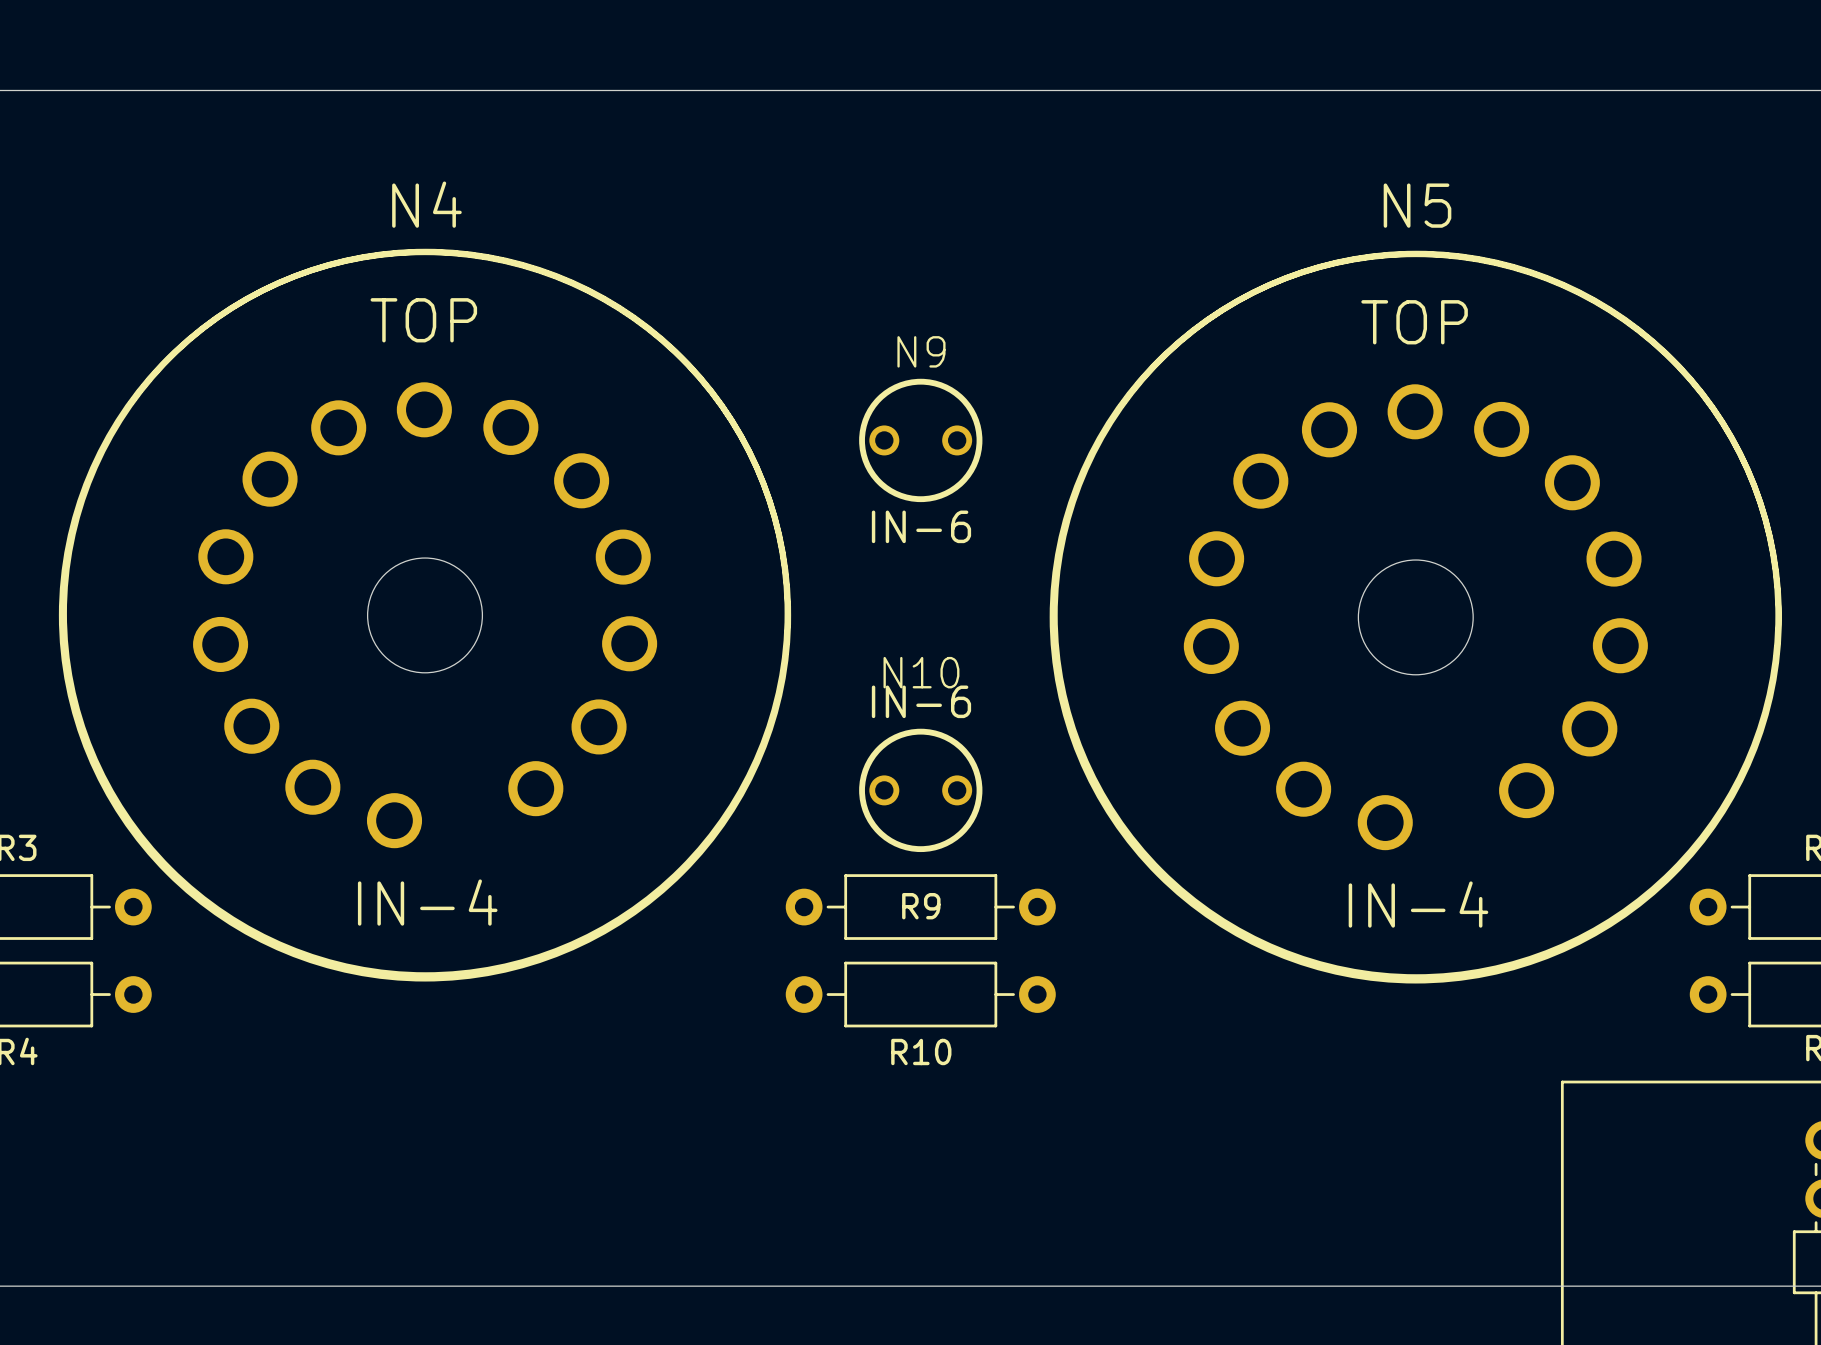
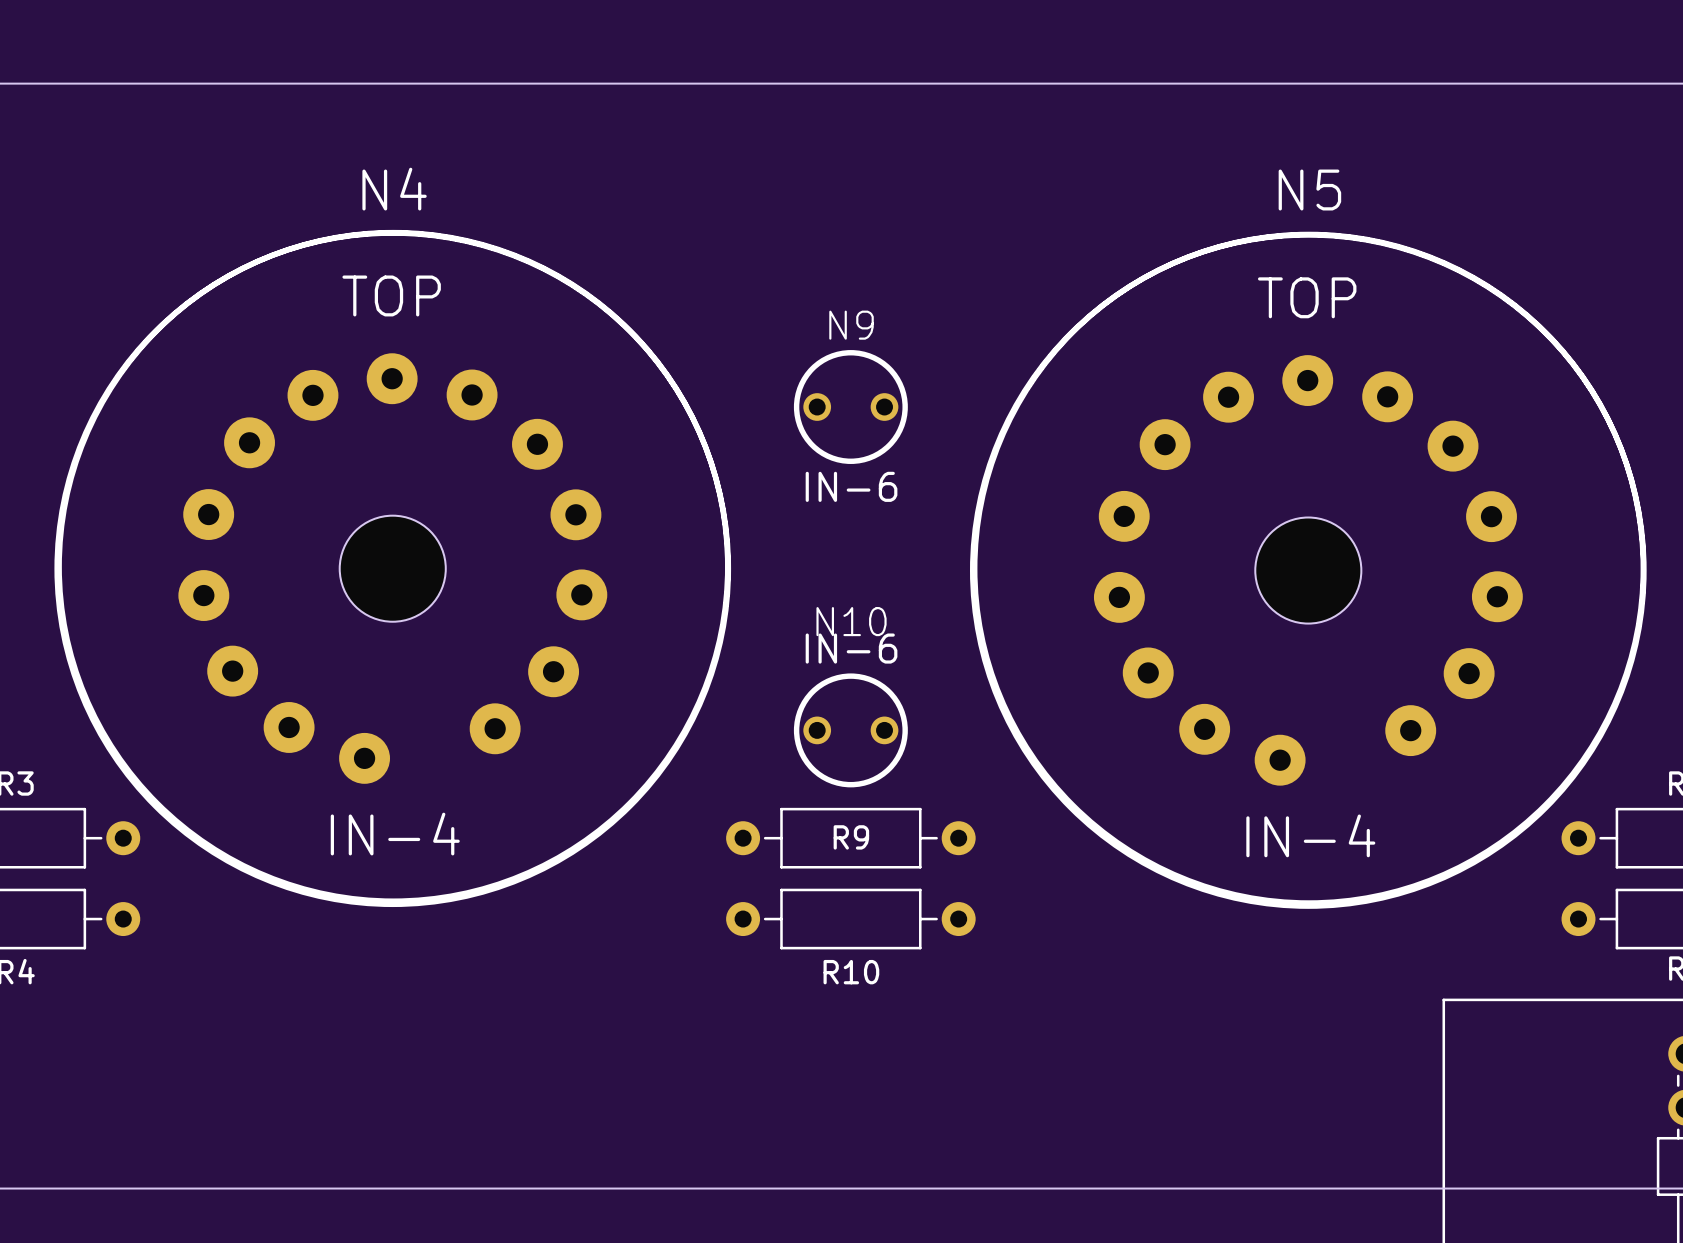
N4 footprint: [58, 248, 792, 982] -> [54, 229, 732, 908]
N5 footprint: [1049, 250, 1782, 984] -> [970, 231, 1647, 909]

